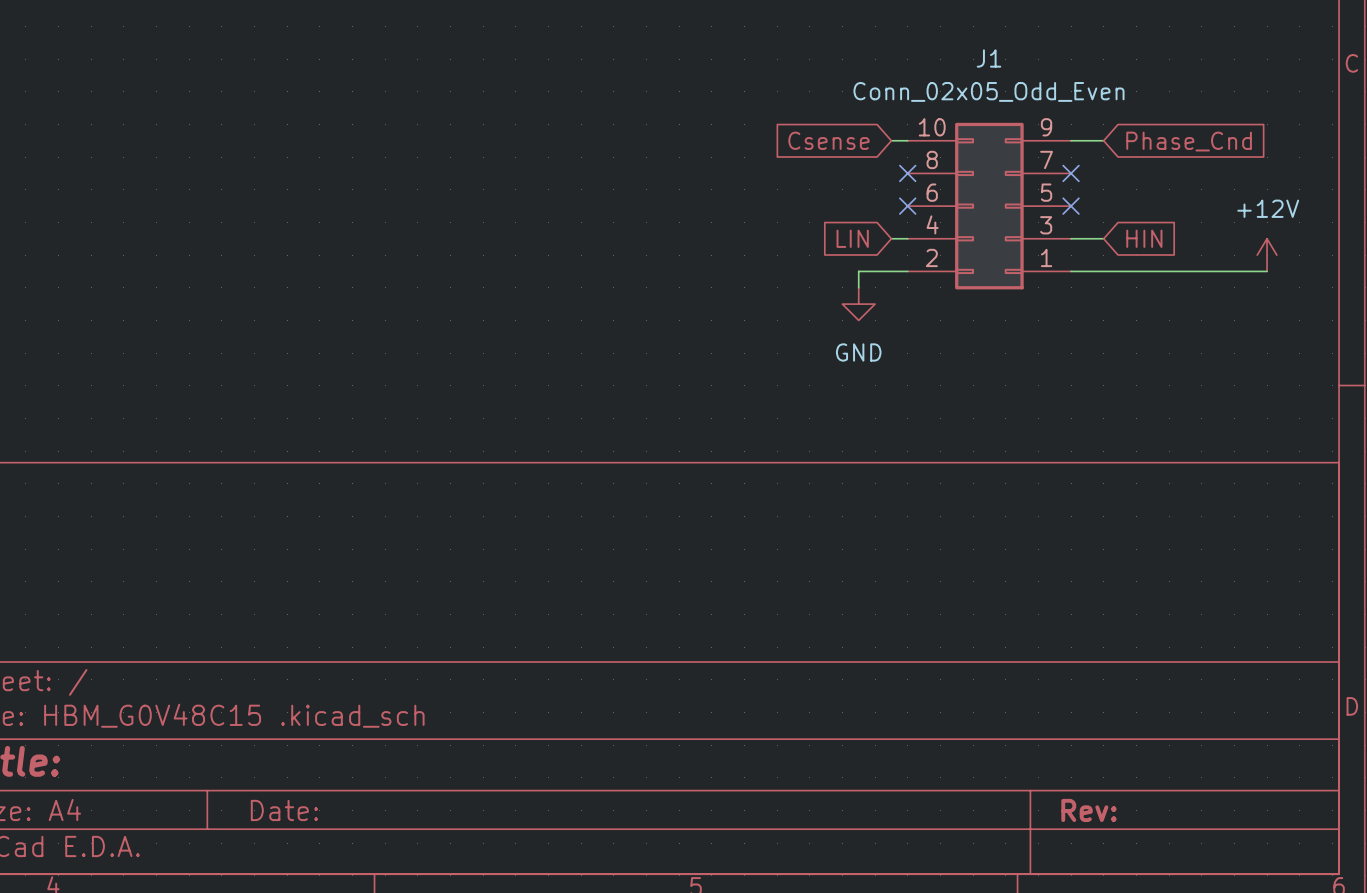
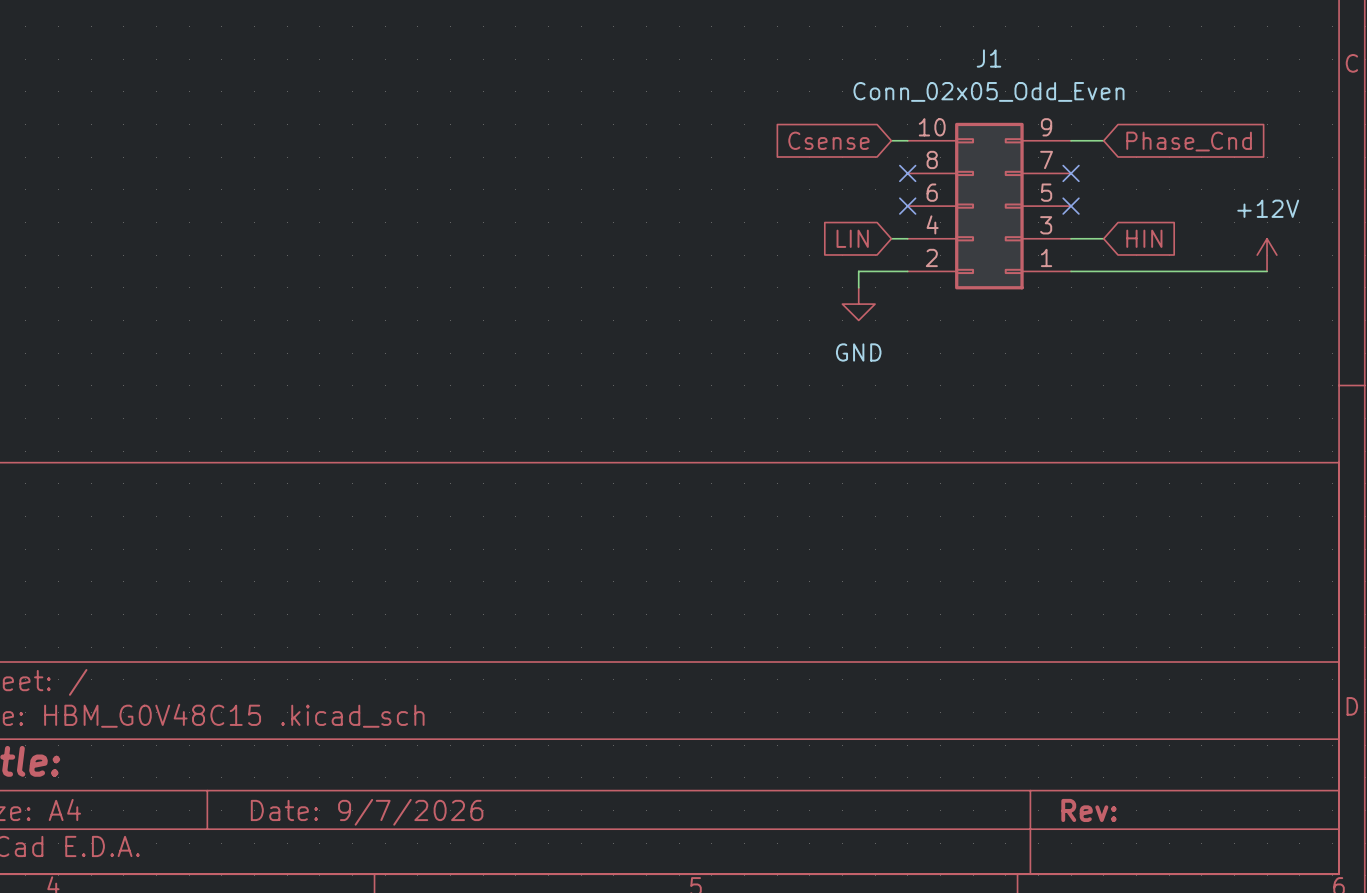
title block: Date: (284, 810) -> Date: 9/7/2026 (367, 812)

